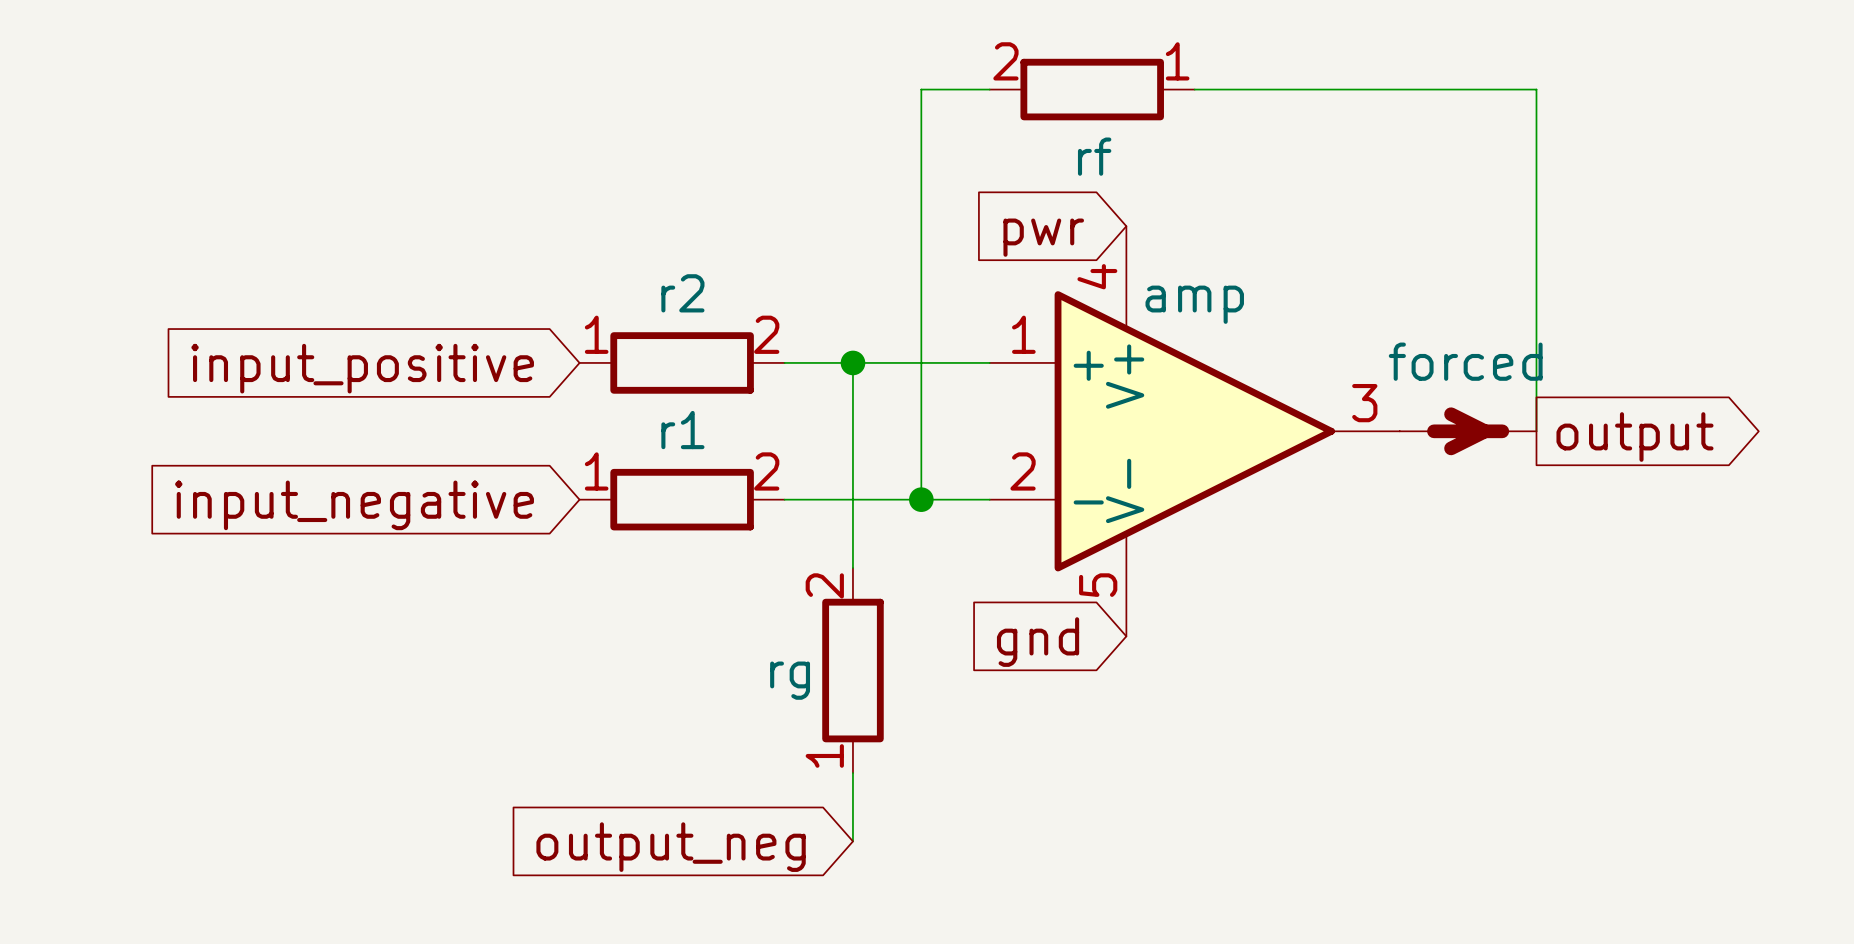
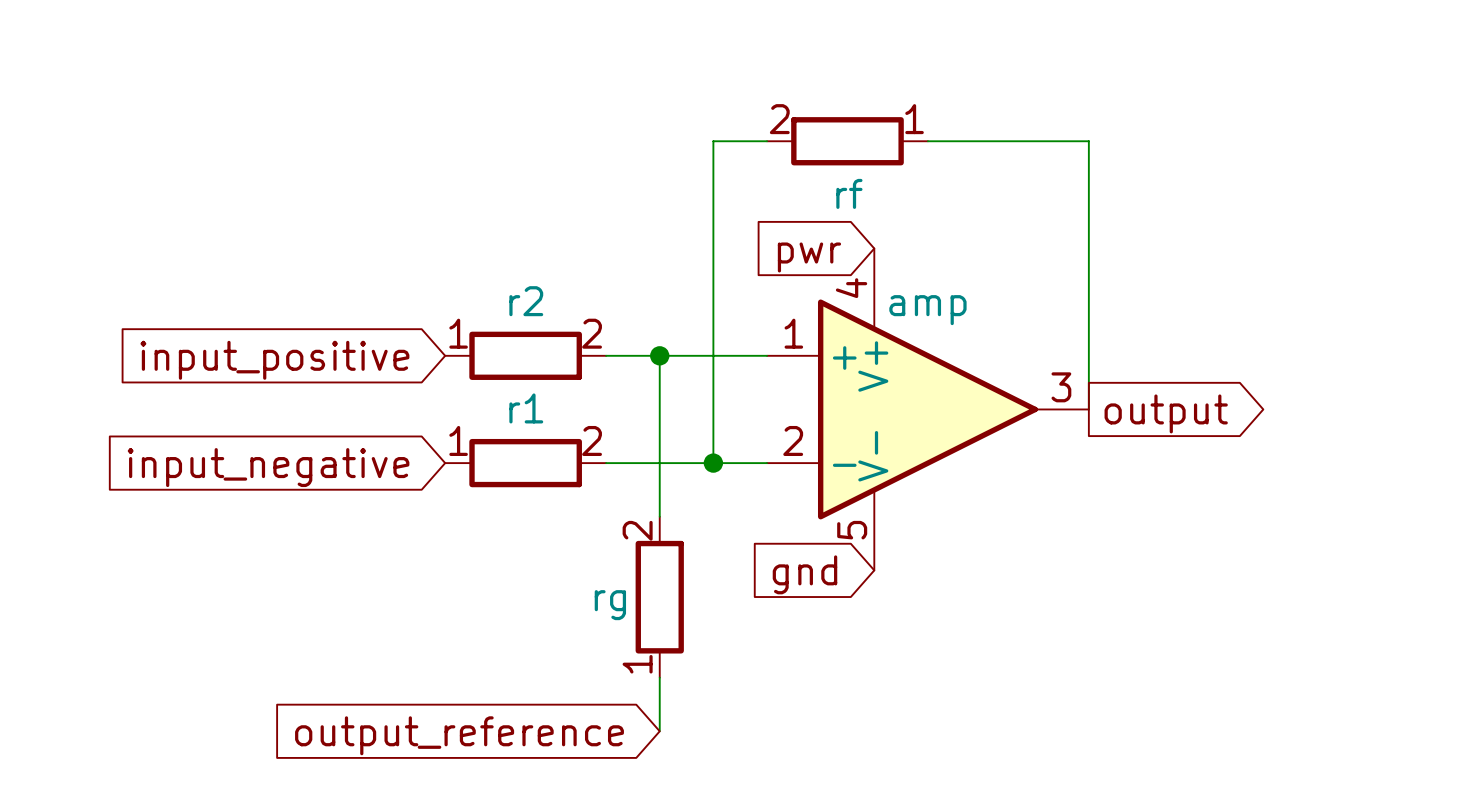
wire: (1399, 89) (1536, 89) (1536, 431) -> (1088, 141) (1088, 409)
forced: (1468, 431) -> none
global label position: output (1634, 437) -> output (1166, 413)
global label: output_neg (671, 847) -> output_reference (459, 735)

